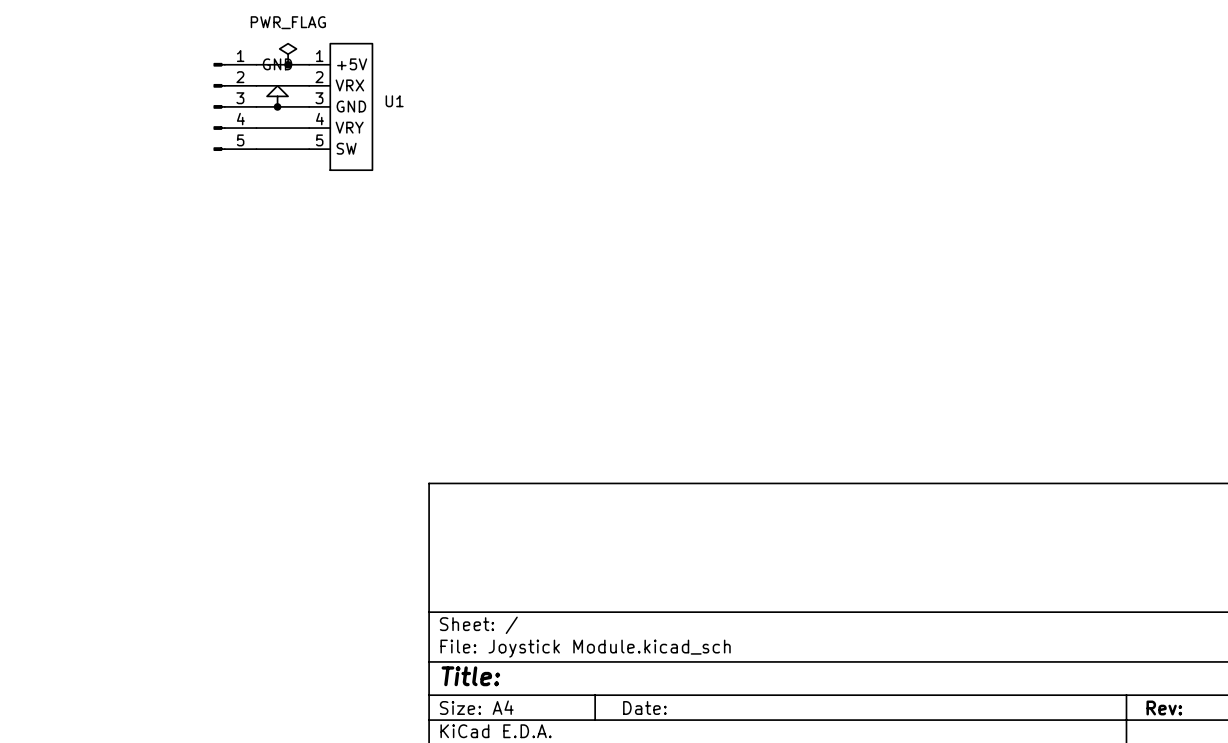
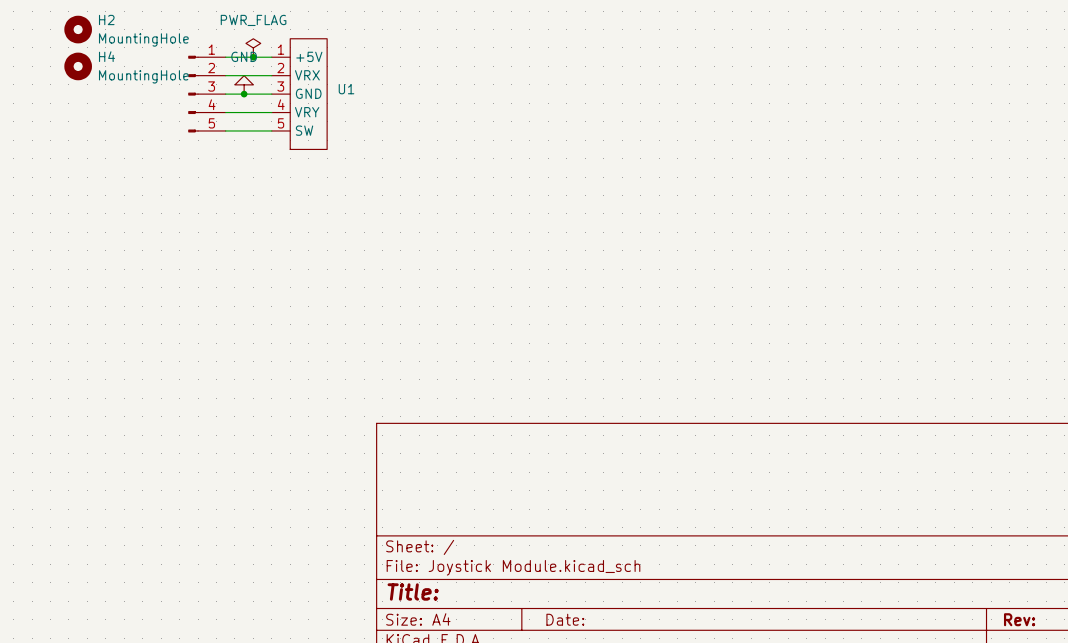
H2: none -> MountingHole (78, 29)
H4: none -> MountingHole (78, 66)

